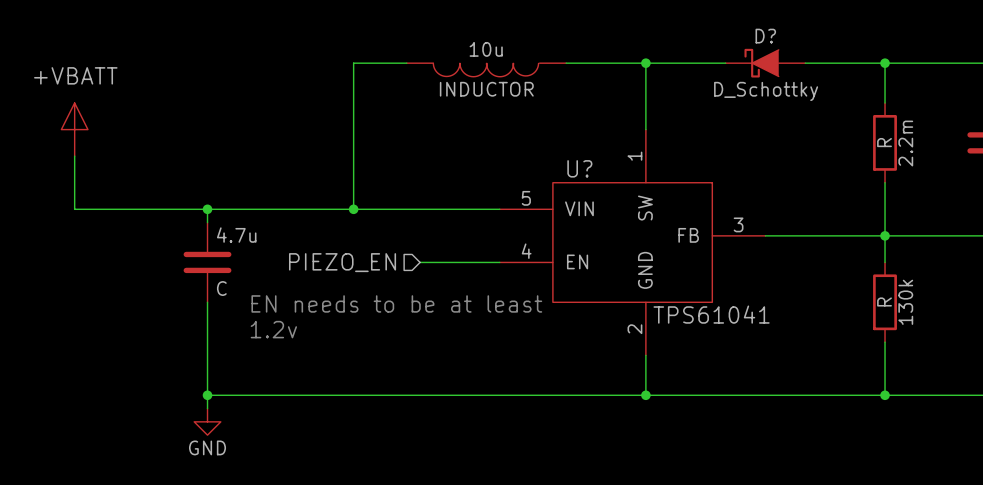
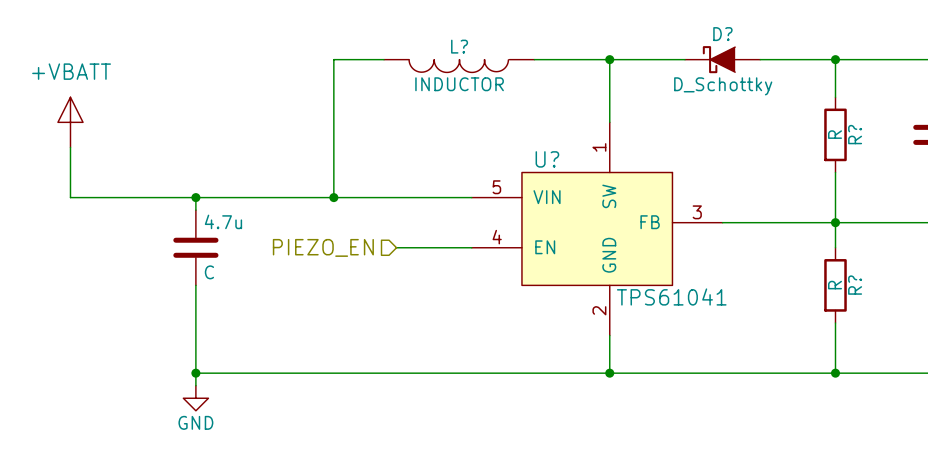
10u name: 10u (486, 49) -> L? (459, 46)
2.2m name: 2.2m (905, 143) -> R? (855, 134)
130k name: 130k (905, 302) -> R? (855, 285)
text: EN needs to be at least (396, 303) -> none
text: 1.2v (273, 329) -> none

